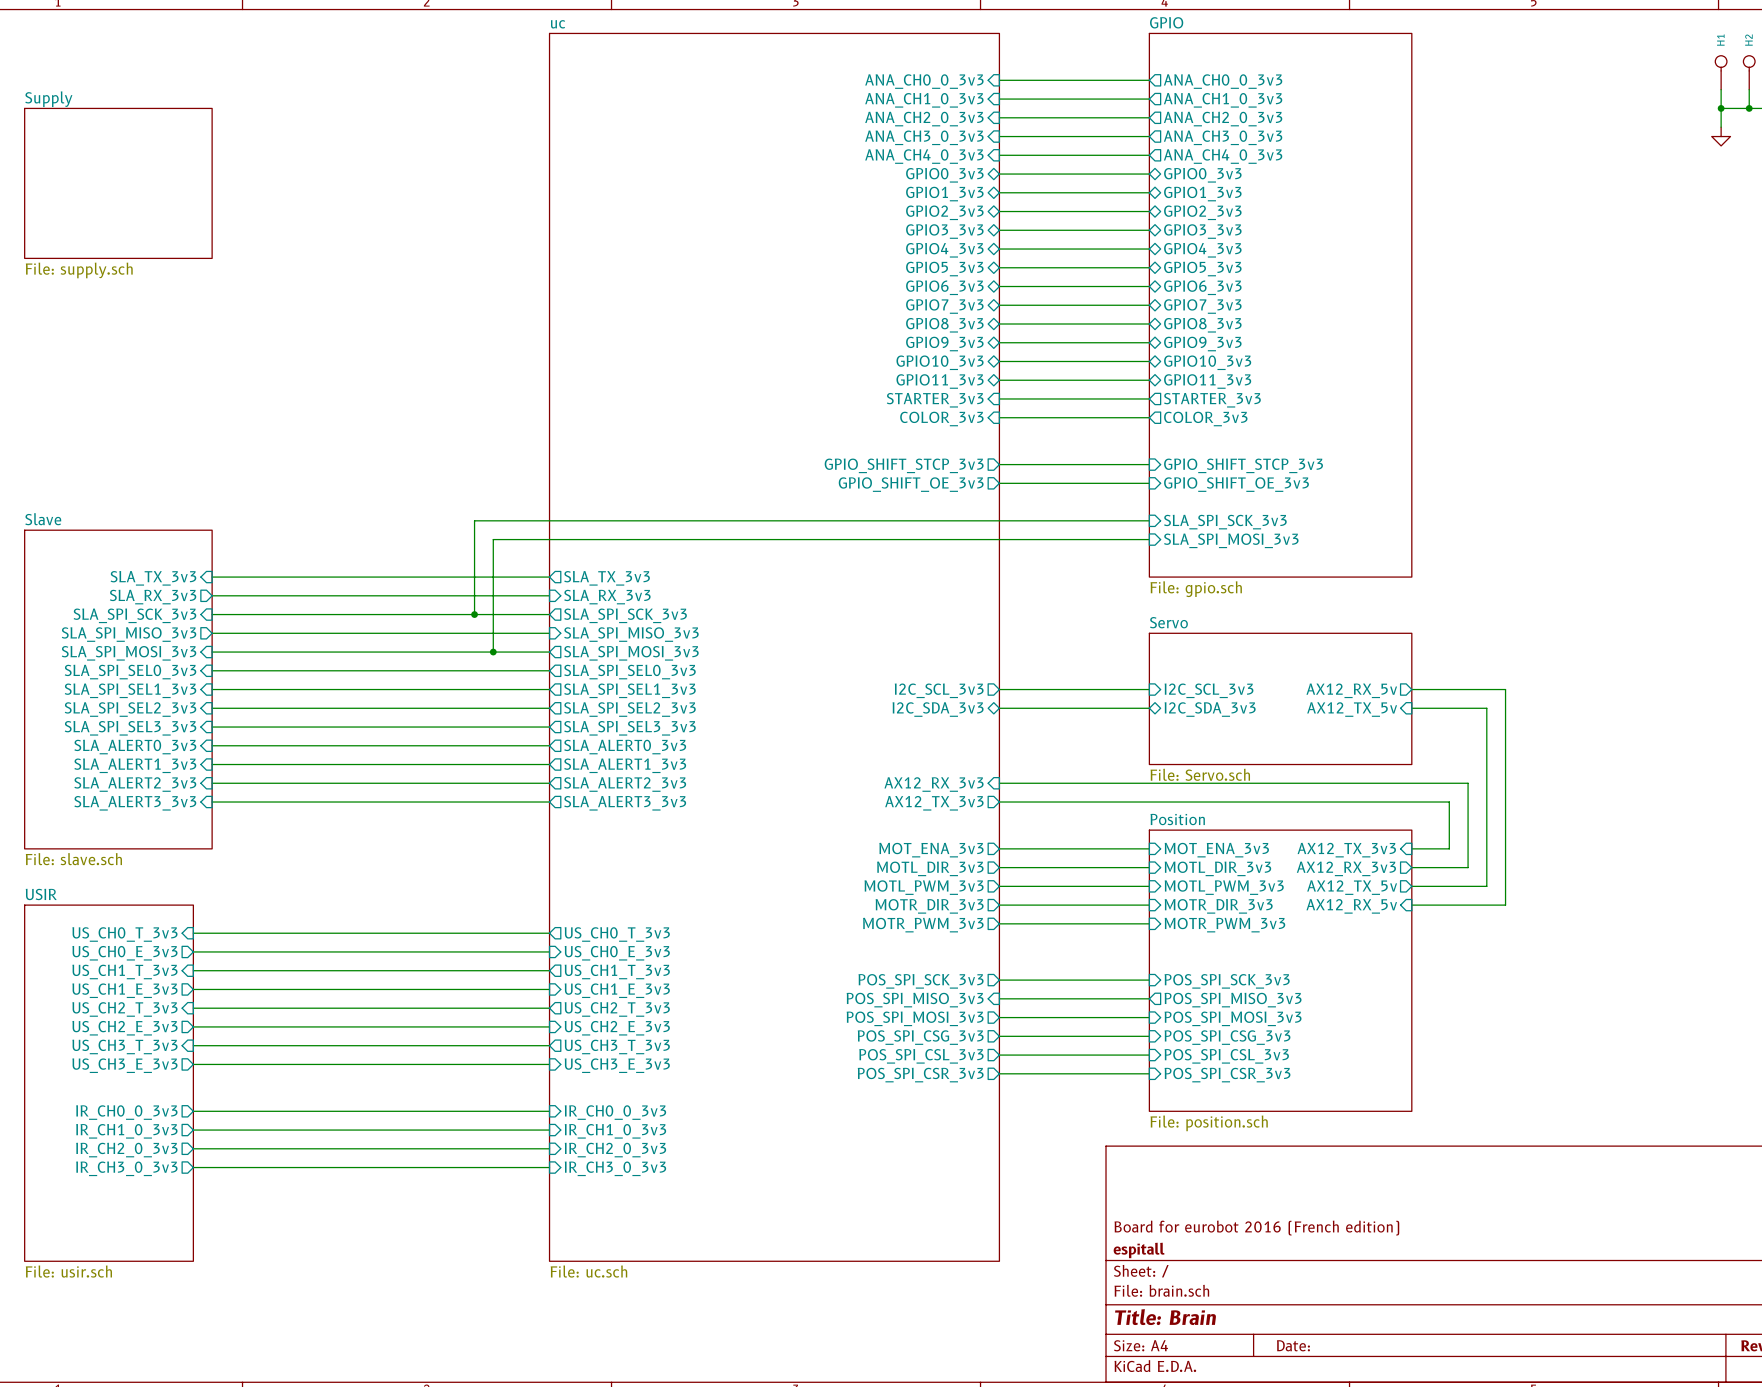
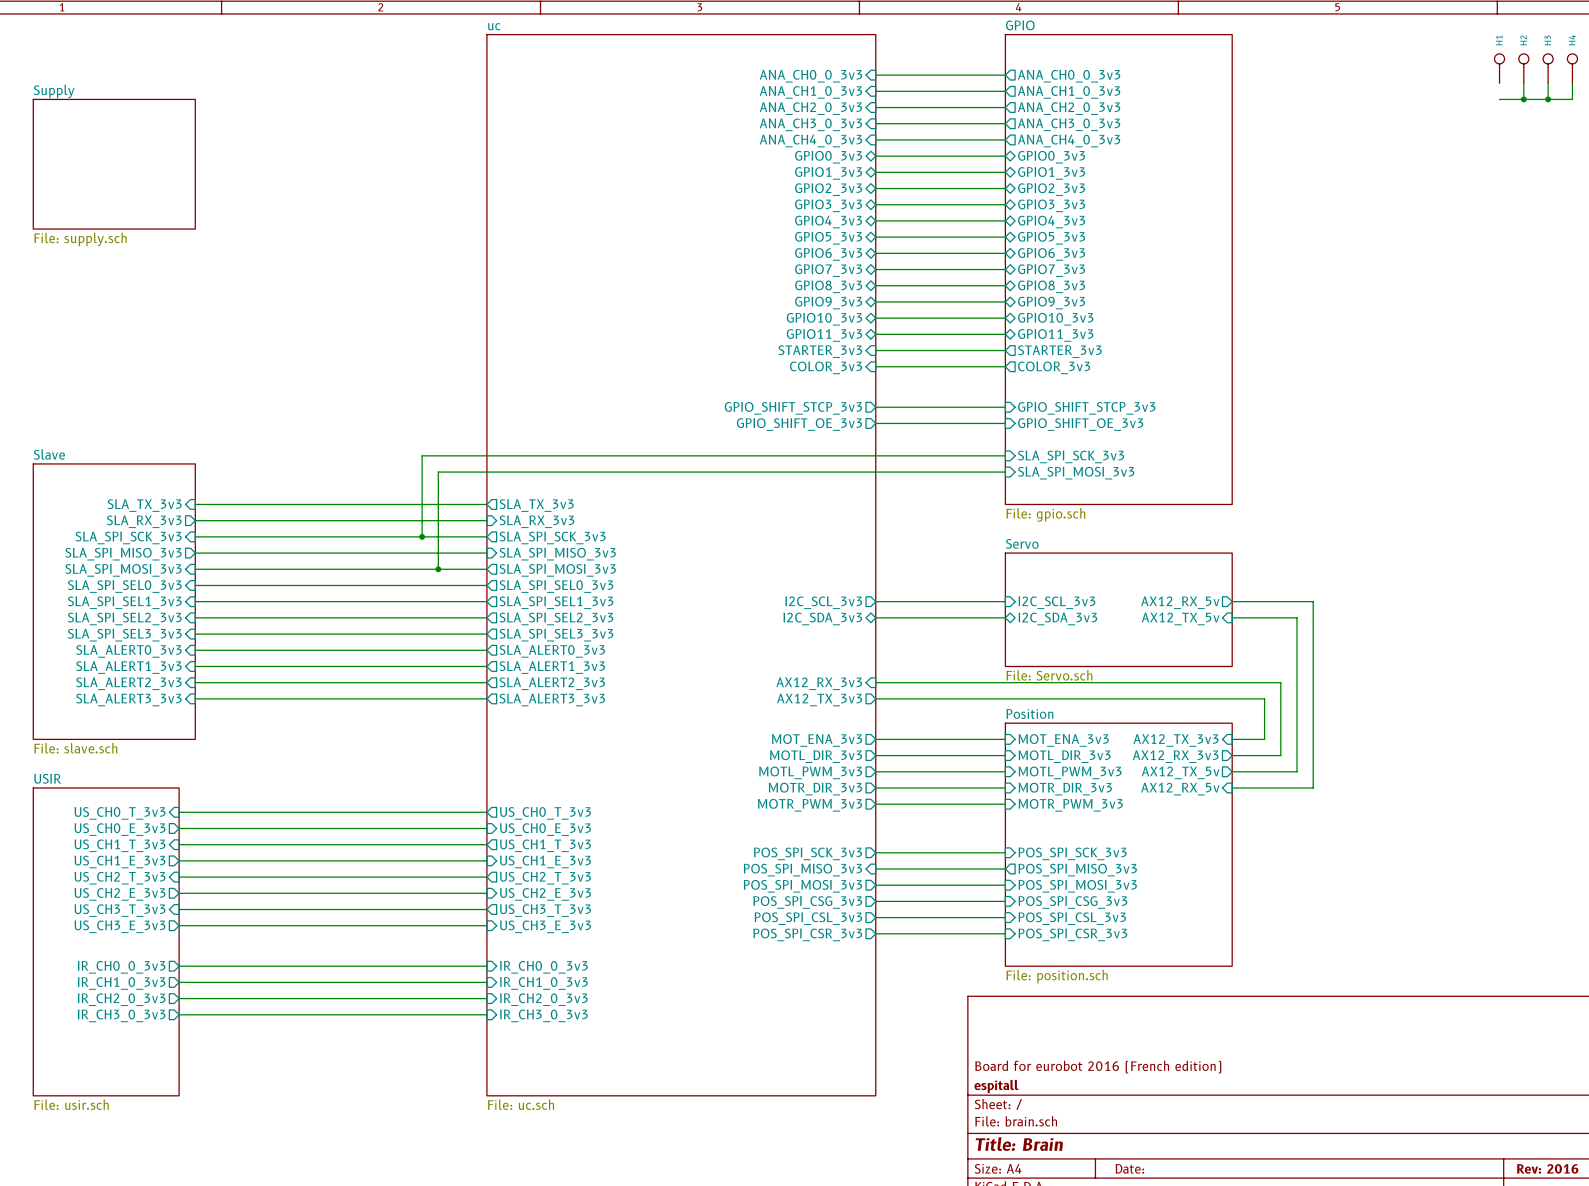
wire: (1721, 89) (1721, 127) -> none
junction: (1721, 108) -> none
power symbol: (1721, 136) -> none

